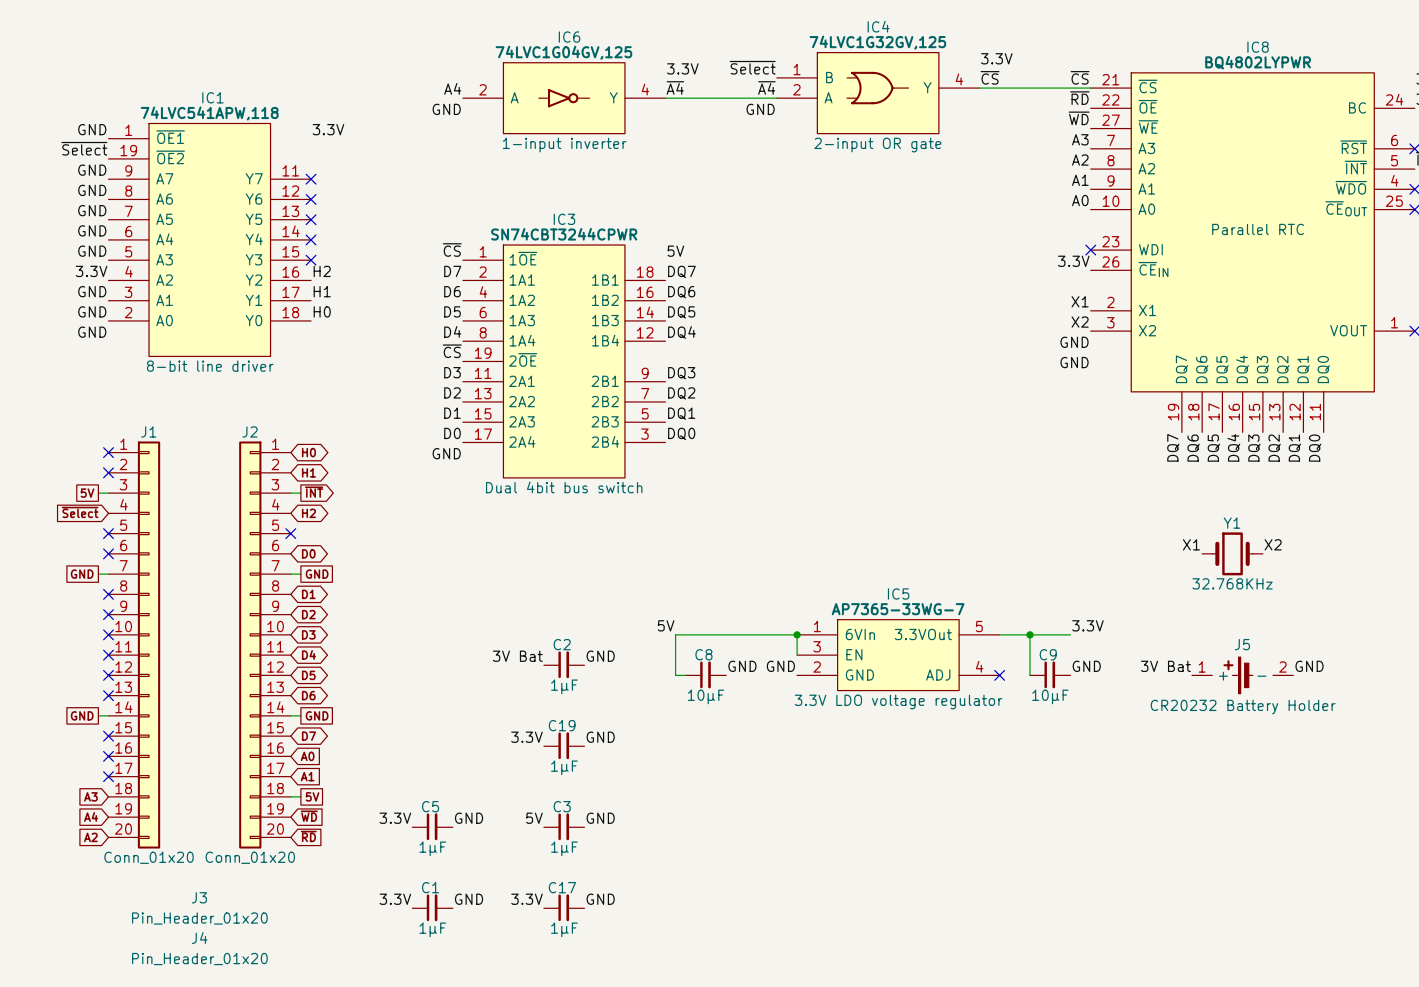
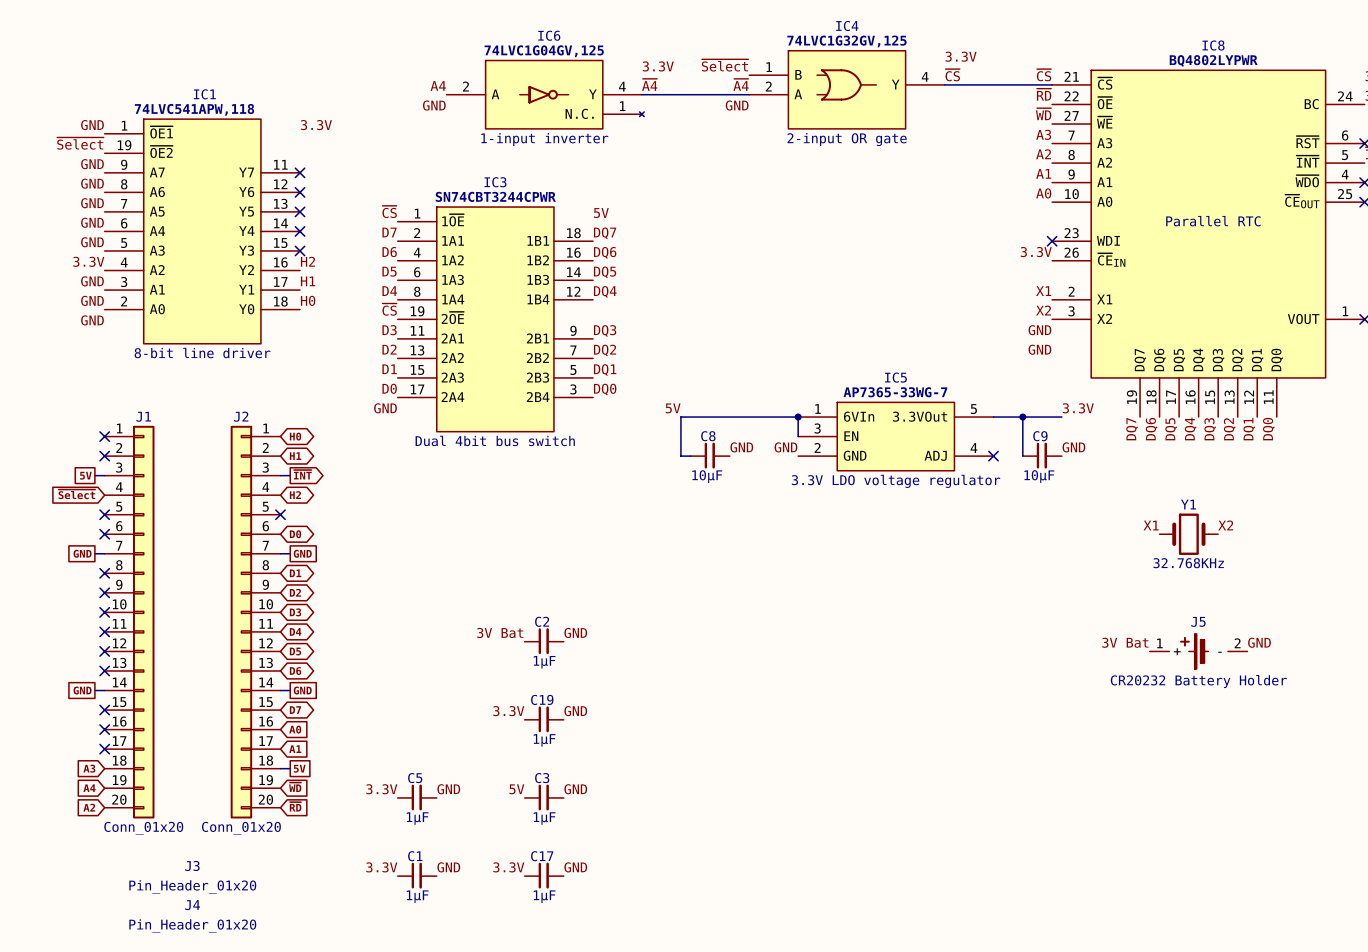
IC6 symbol: [462, 62, 666, 135] -> [446, 59, 645, 130]
label: none -> ~{CS} (389, 211)
label: ~{CS} (452, 250) -> none
label position: 5V (675, 251) -> 5V (601, 213)
label position: D7 (452, 271) -> D7 (389, 232)
label position: DQ7 (681, 271) -> DQ7 (605, 233)
label position: D6 (452, 291) -> D6 (389, 252)
label position: DQ6 (681, 292) -> DQ6 (605, 252)
label position: D5 (452, 311) -> D5 (389, 271)
label position: DQ5 (681, 312) -> DQ5 (605, 272)
label: none -> ~{CS} (389, 309)
label position: D4 (452, 331) -> D4 (389, 291)
label position: DQ4 (681, 332) -> DQ4 (605, 291)
label: ~{CS} (452, 351) -> none
IC3 position: (564, 361) -> (495, 319)
label position: D3 (452, 372) -> D3 (389, 330)
label position: DQ3 (681, 373) -> DQ3 (605, 330)
label position: D2 (452, 392) -> D2 (389, 349)
label position: DQ2 (681, 393) -> DQ2 (605, 350)
label position: D1 (452, 413) -> D1 (389, 369)
label position: DQ1 (681, 413) -> DQ1 (605, 370)
label: none -> 5V (673, 408)
label: none -> 3.3V (1078, 408)
junction: none -> (798, 417)
wire: none -> (993, 417) (1061, 417)
wire: none -> (1022, 417) (1022, 456)
junction: none -> (1022, 417)
label position: D0 (452, 433) -> D0 (389, 388)
label position: DQ0 (681, 433) -> DQ0 (605, 389)
wire: none -> (798, 436) (798, 417) (680, 417) (680, 456) (690, 456)
label position: GND (446, 453) -> GND (385, 408)
label: none -> GND (741, 447)
label: none -> GND (785, 447)
label: none -> GND (1073, 447)
no-connect mark: none -> (993, 456)
label: 5V (666, 625) -> none
label: 3.3V (1087, 625) -> none
junction: (797, 634) -> none
wire: (999, 634) (1070, 634) -> none
wire: (1030, 634) (1030, 675) -> none
junction: (1030, 634) -> none
wire: (797, 655) (797, 634) (675, 634) (675, 675) (685, 675) -> none
IC5 position: (898, 655) -> (895, 436)
label: GND (742, 666) -> none
label: GND (780, 666) -> none
label: GND (1086, 666) -> none
C8 position: (705, 674) -> (710, 455)
C9 position: (1050, 674) -> (1042, 455)
no-connect mark: (999, 675) -> none

